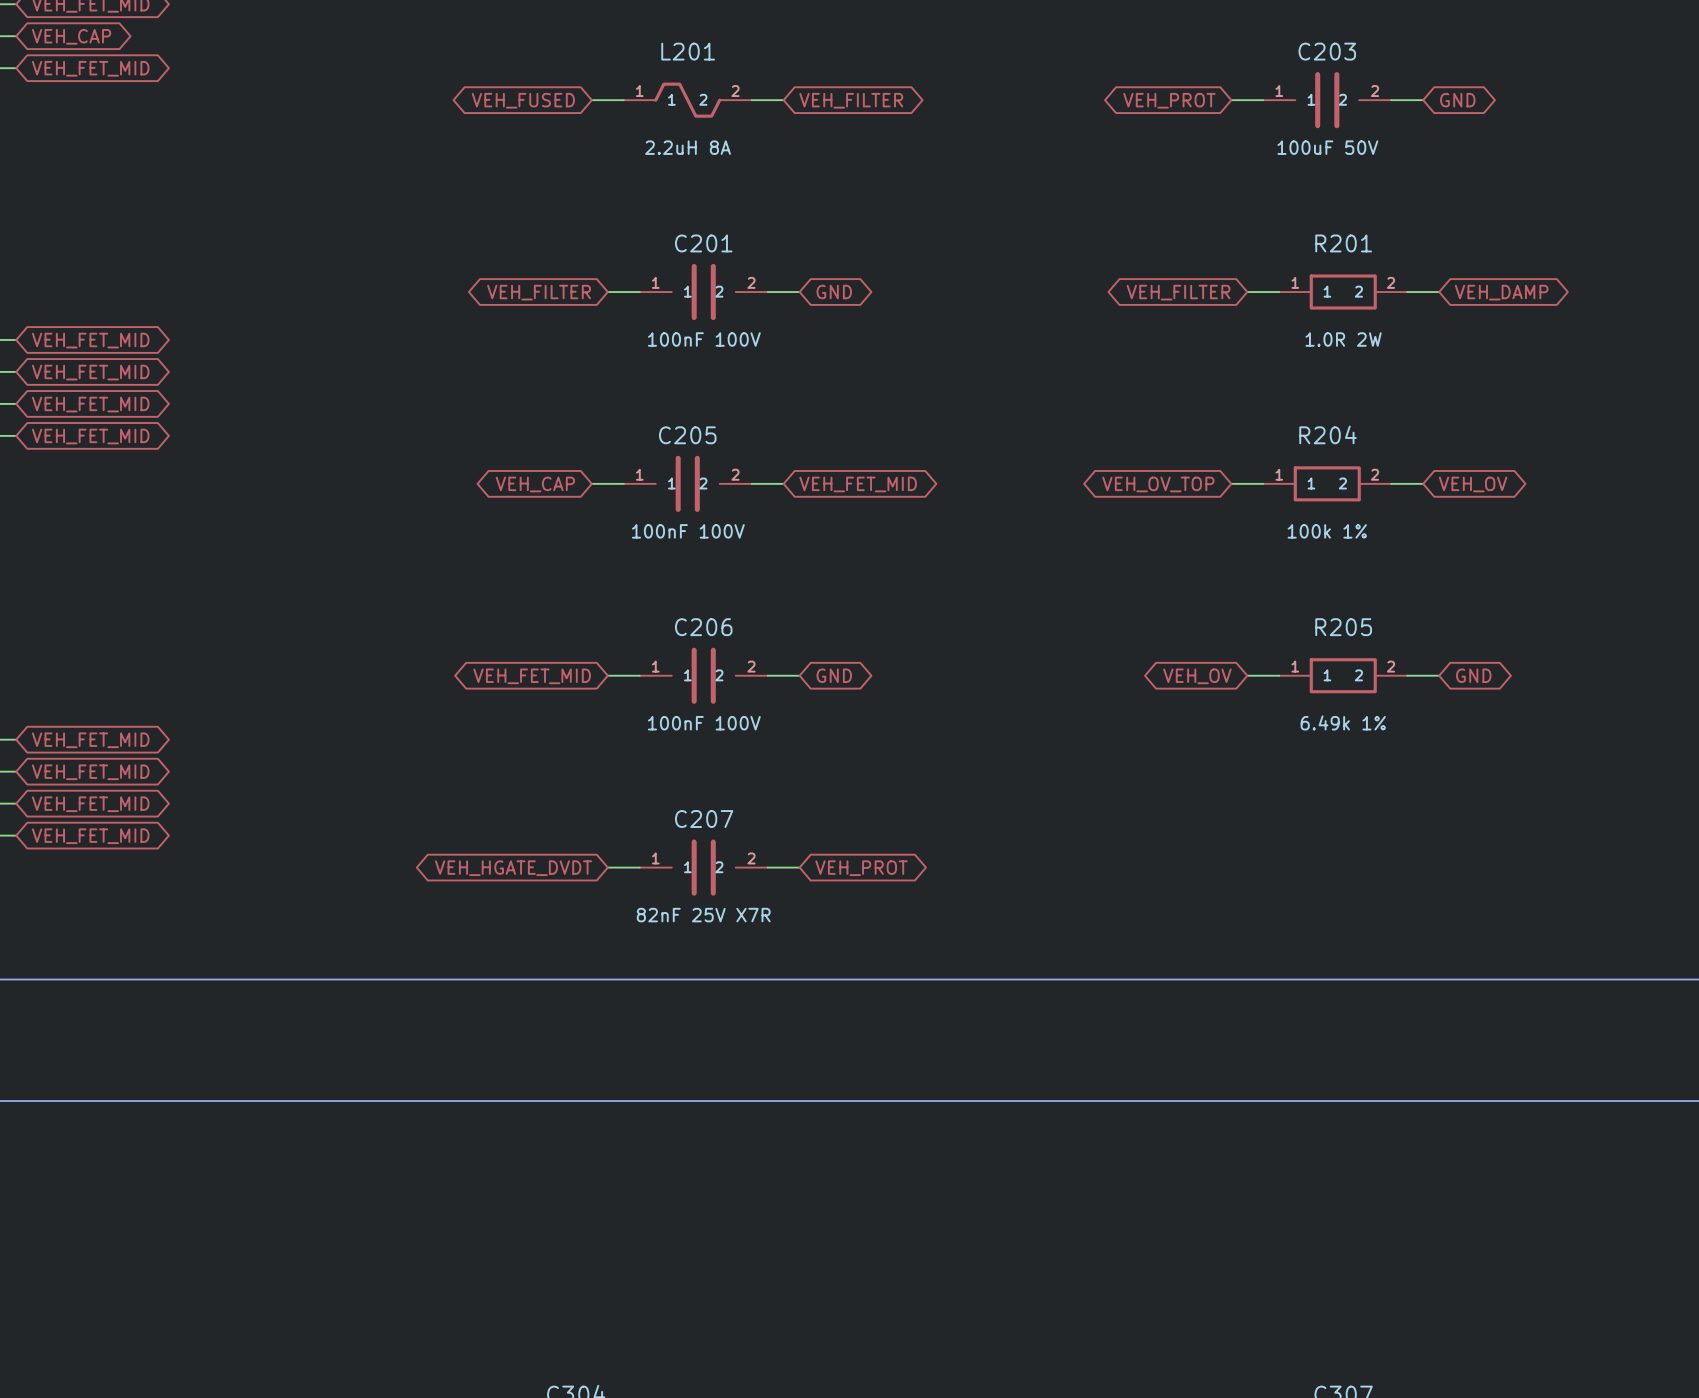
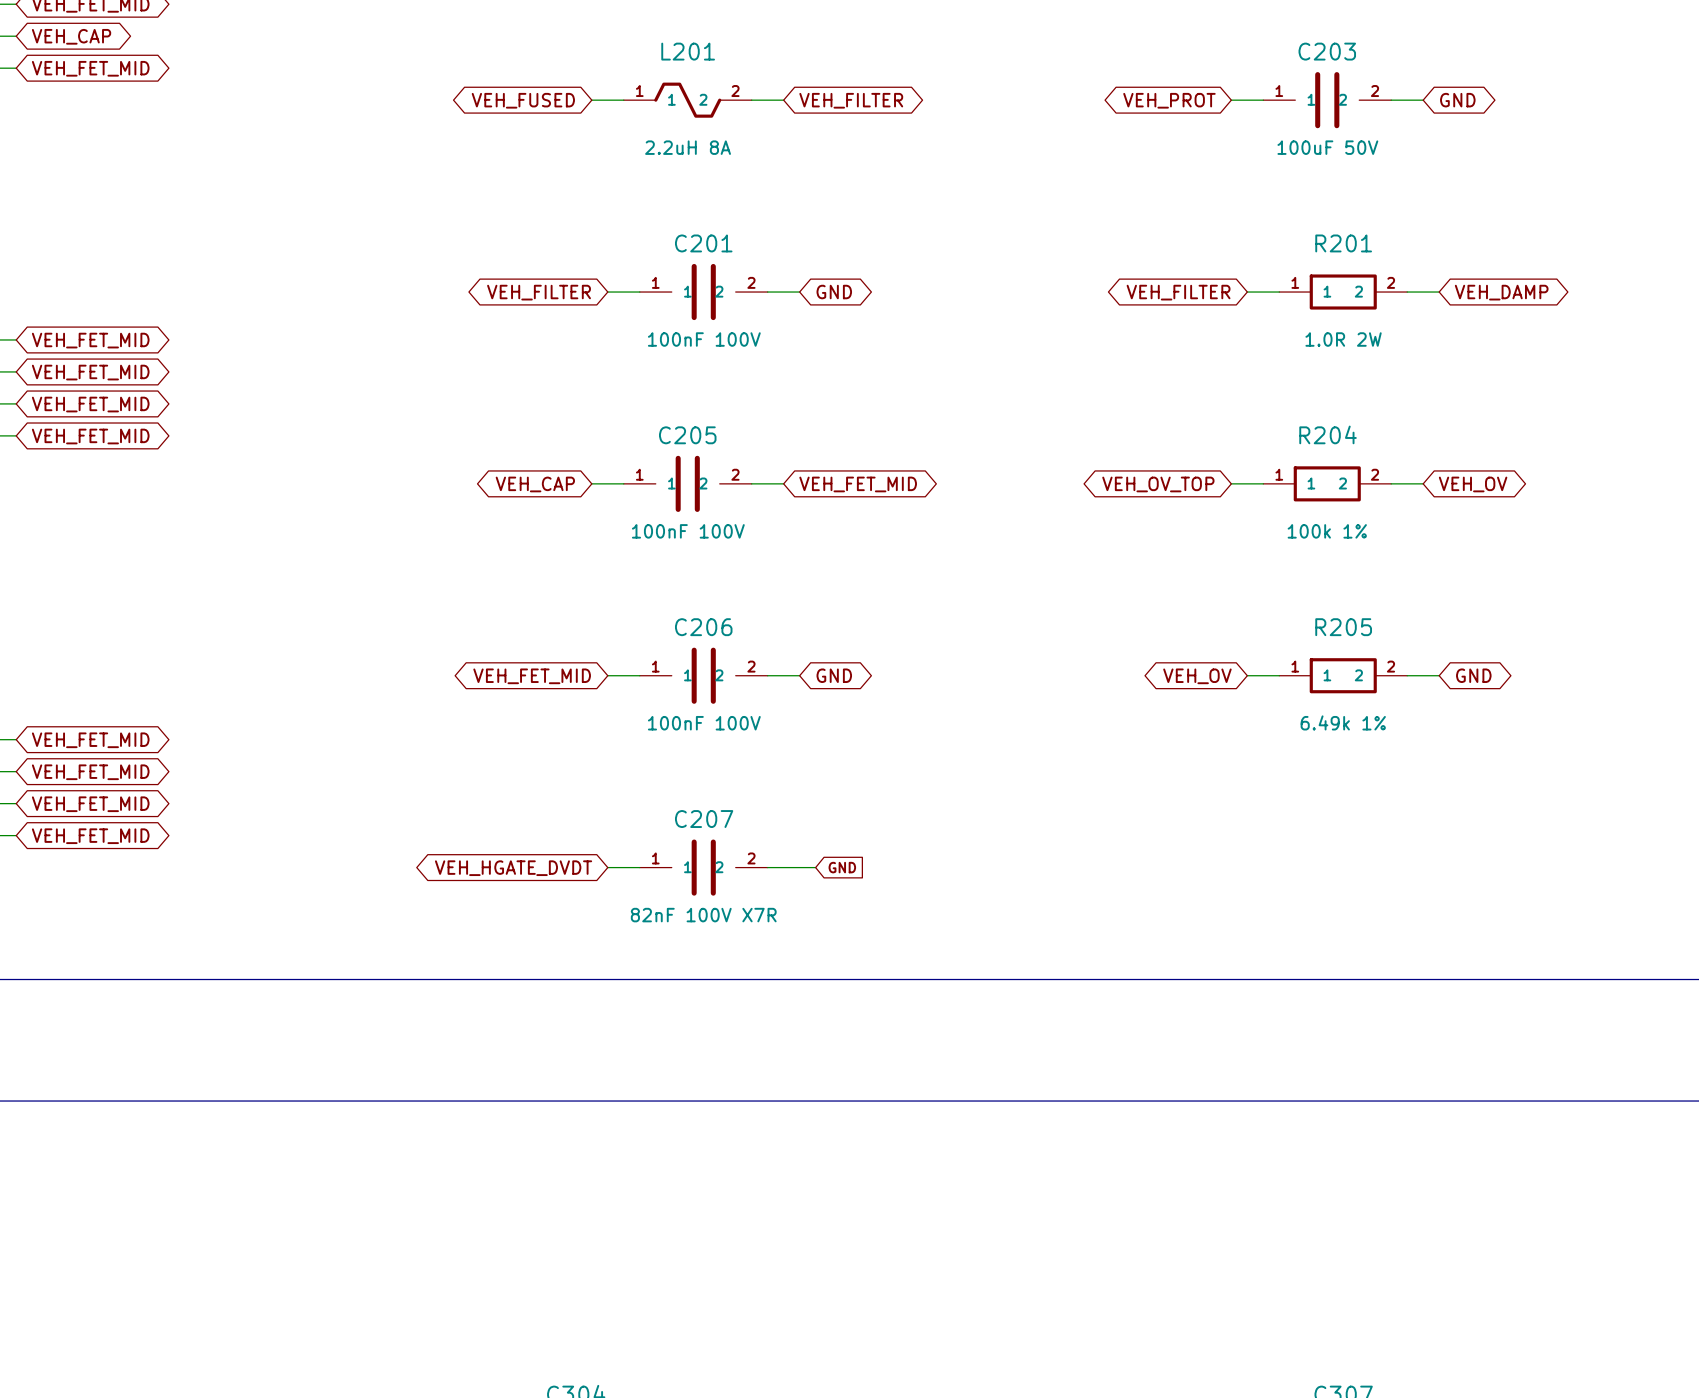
wire: none -> (799, 867) (815, 867)
global label: none -> GND (842, 867)
global label: VEH_PROT (861, 868) -> none
C207 value: 82nF 25V X7R (703, 915) -> 82nF 100V X7R (703, 915)

